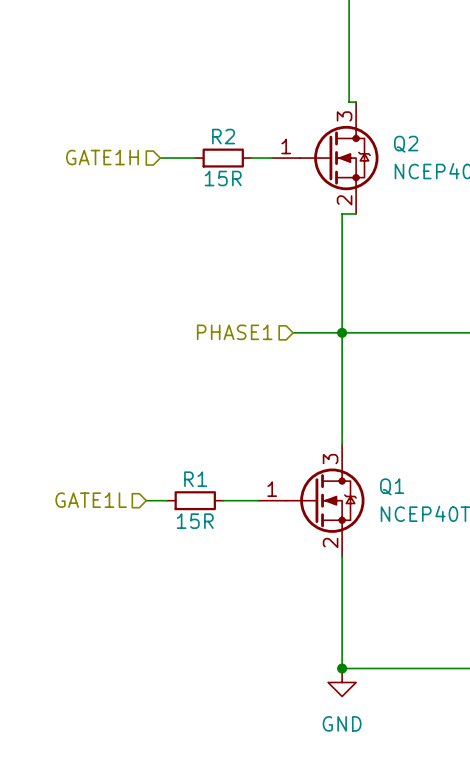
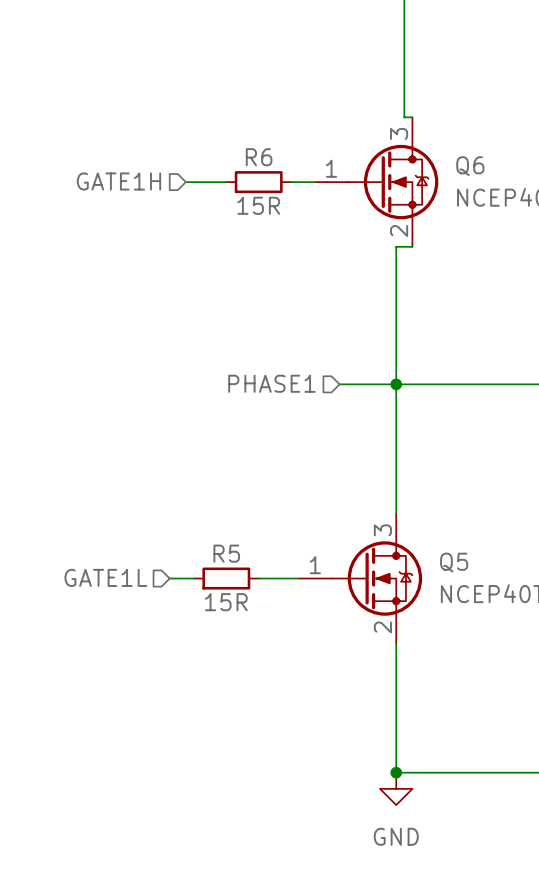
R2 name: R2 (223, 136) -> R6 (259, 157)
Q2 name: Q2 (406, 144) -> Q6 (470, 166)
R1 name: R1 (195, 479) -> R5 (226, 553)
Q1 name: Q1 (392, 486) -> Q5 (454, 562)

